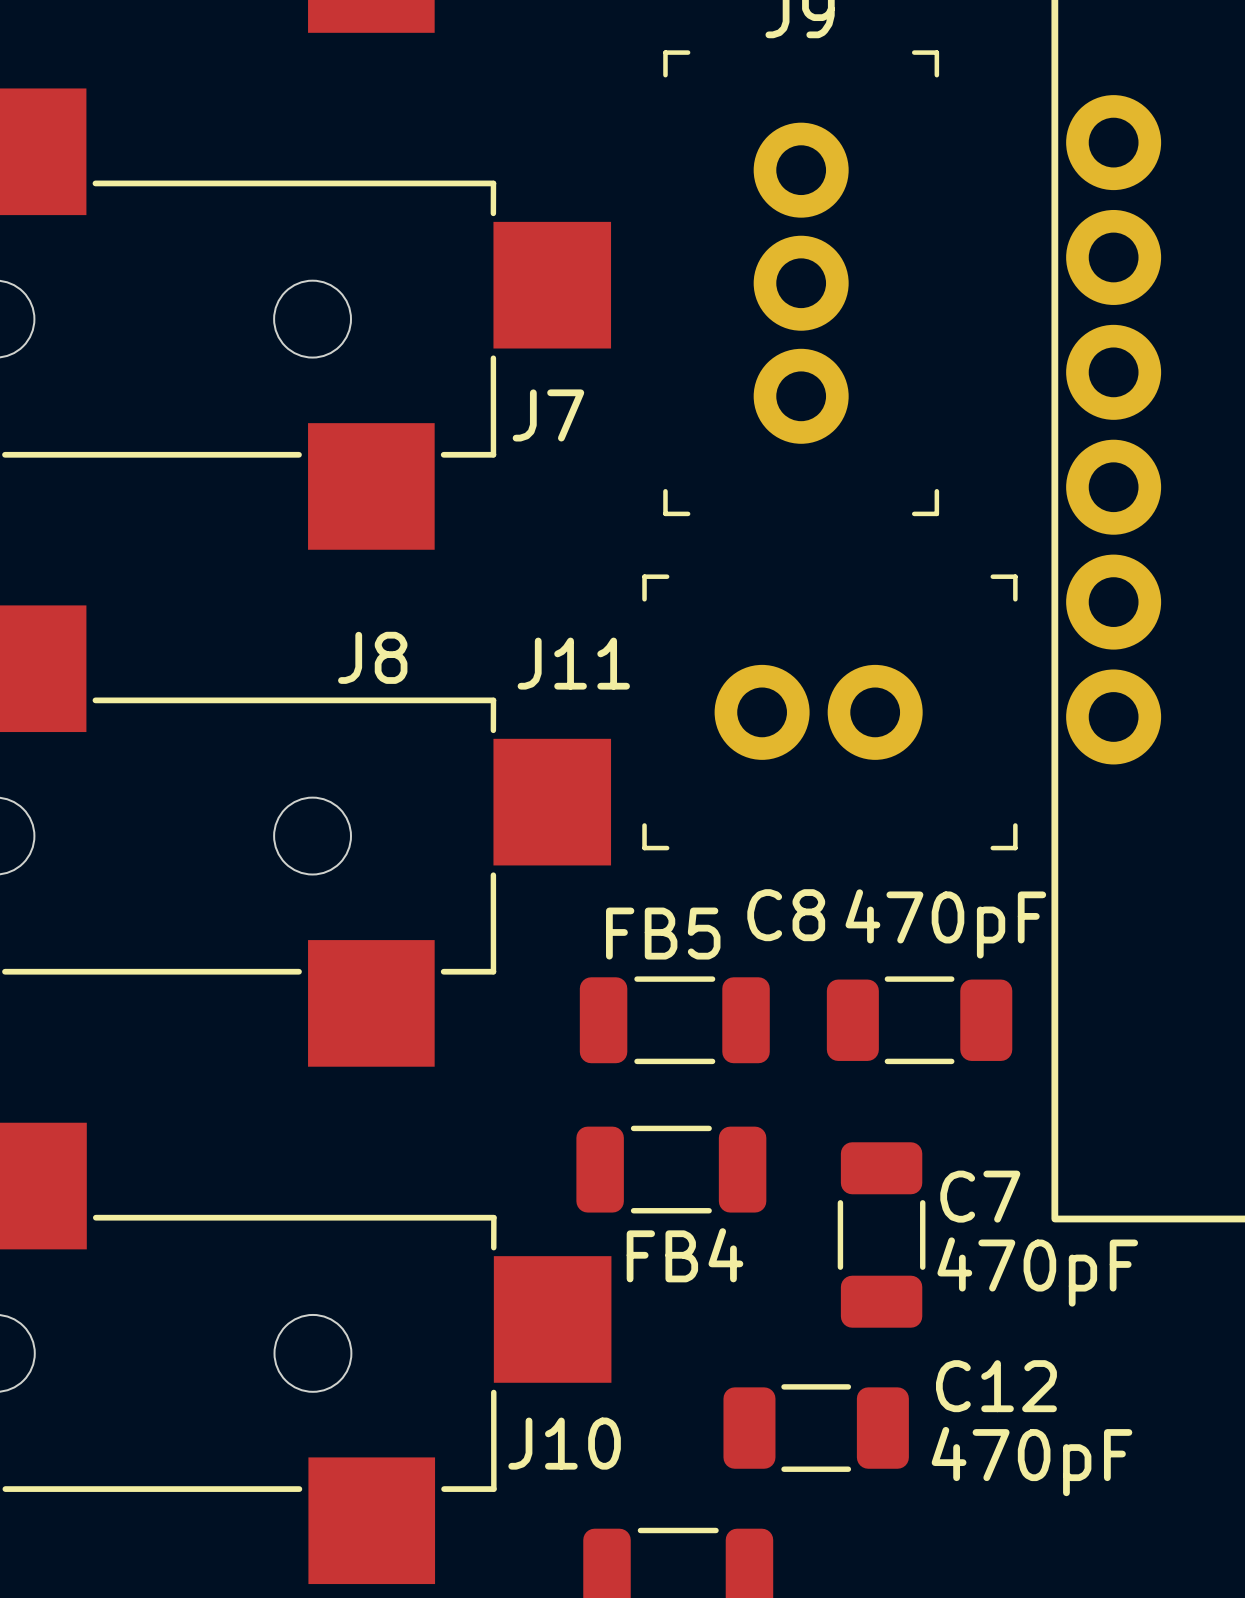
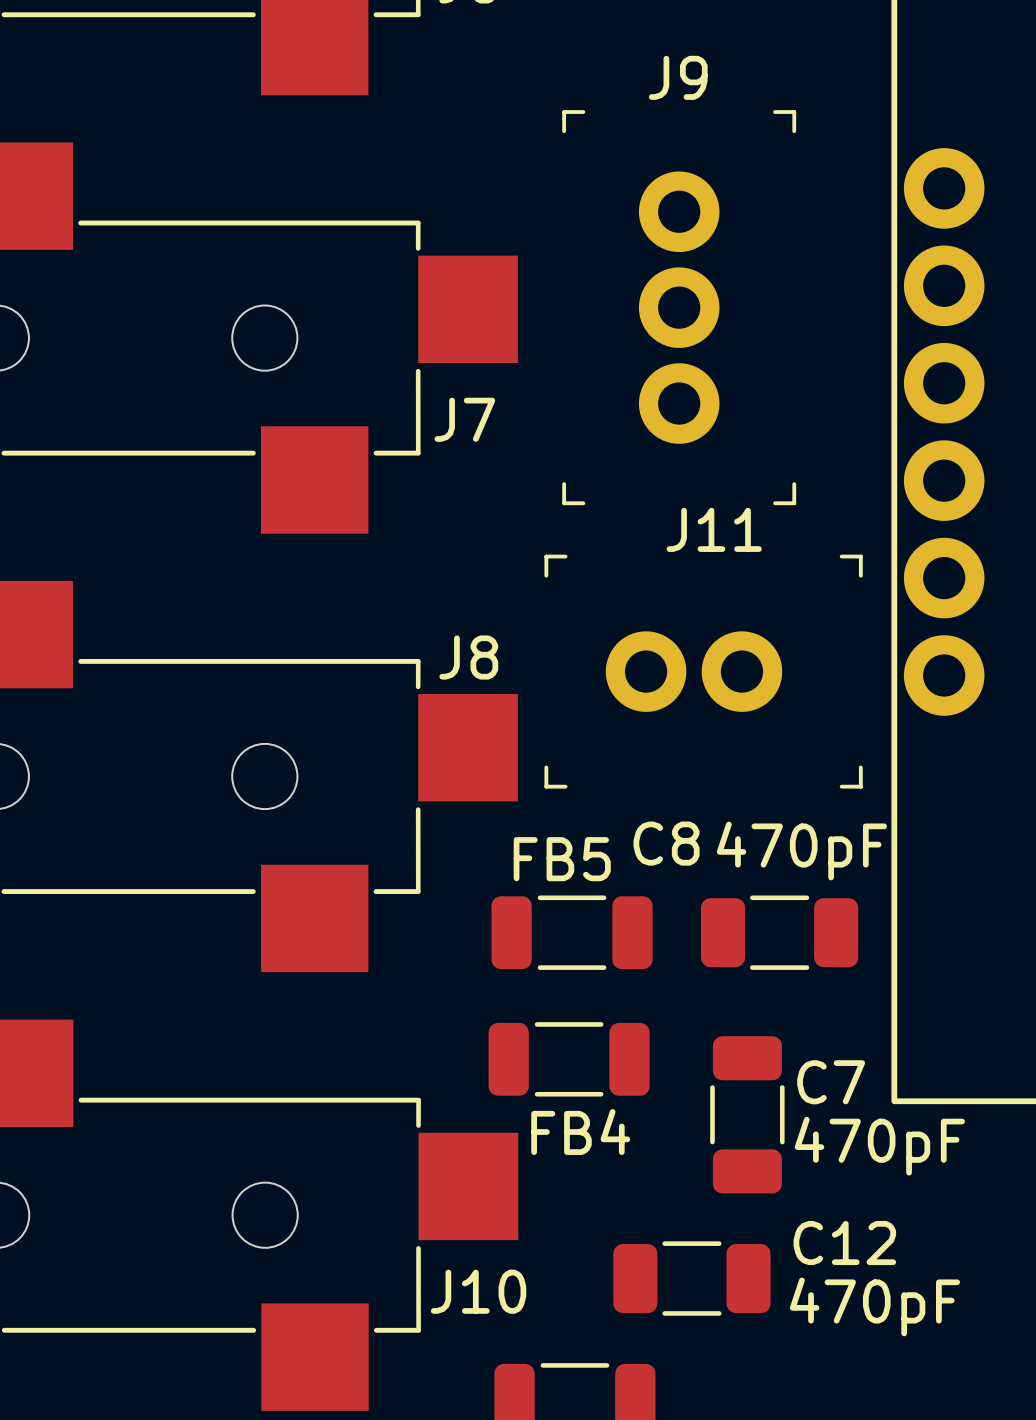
J8 name position: J8 (372, 657) -> J8 (468, 657)
J11 name position: J11 (573, 663) -> J11 (714, 529)

